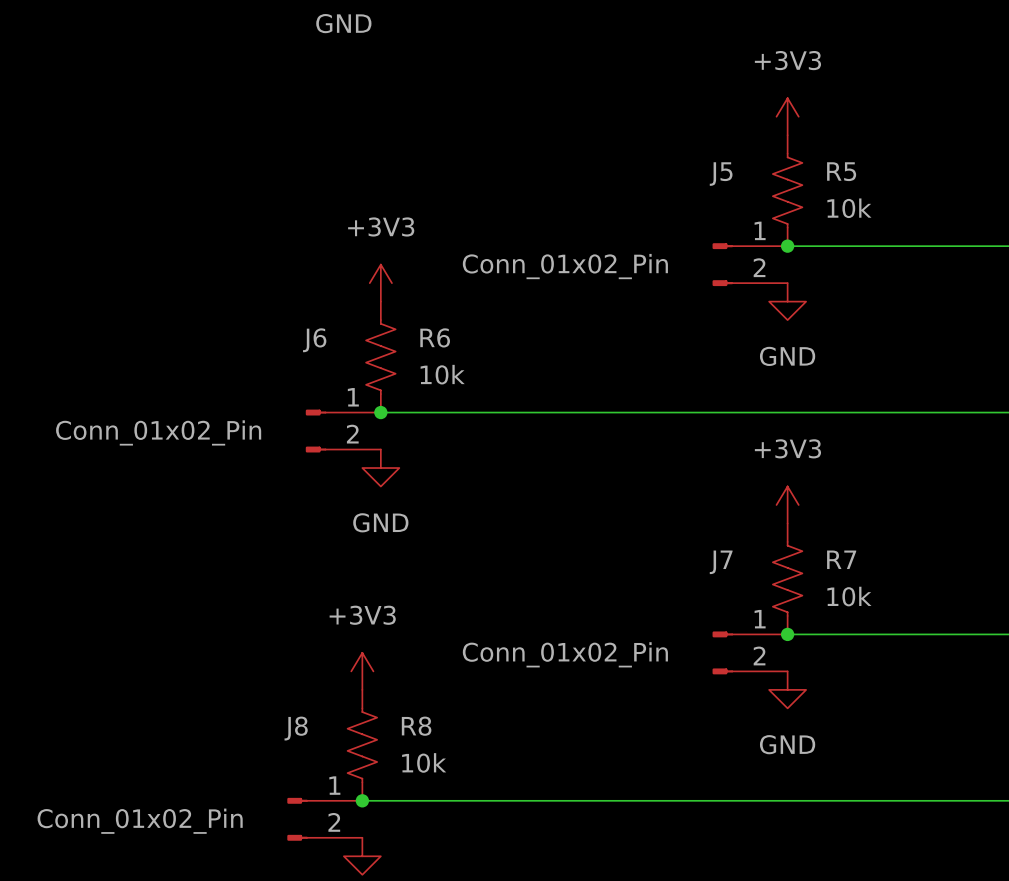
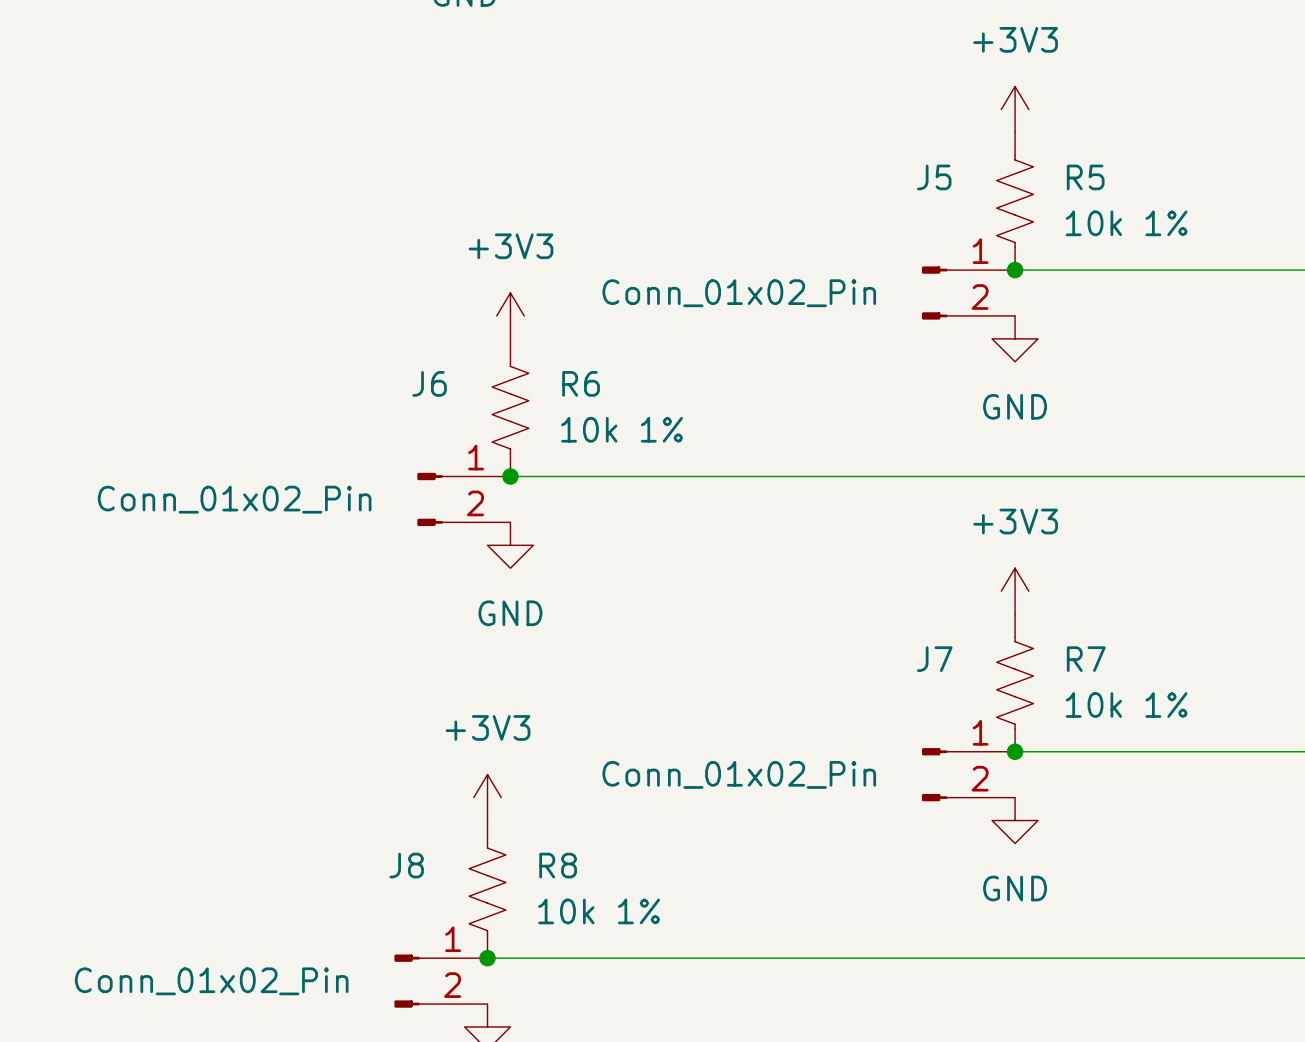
R5 value: 10k (849, 208) -> 10k 1% (1126, 223)
R6 value: 10k (442, 374) -> 10k 1% (622, 429)
R7 value: 10k (849, 596) -> 10k 1% (1126, 705)
R8 value: 10k (424, 762) -> 10k 1% (599, 911)

